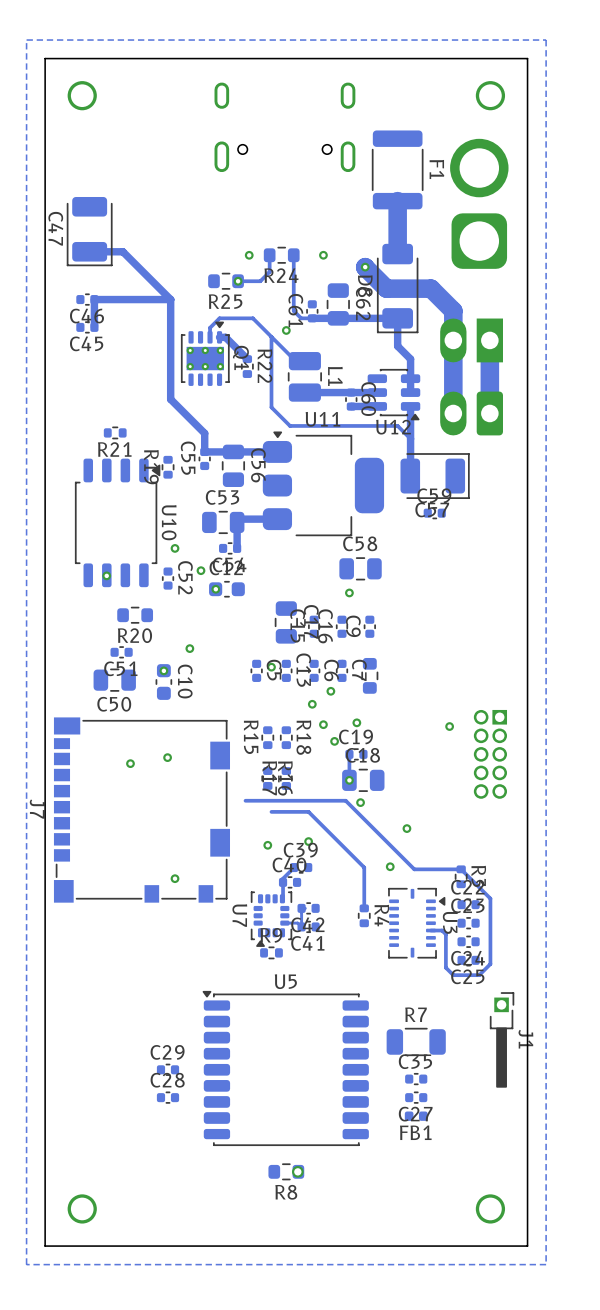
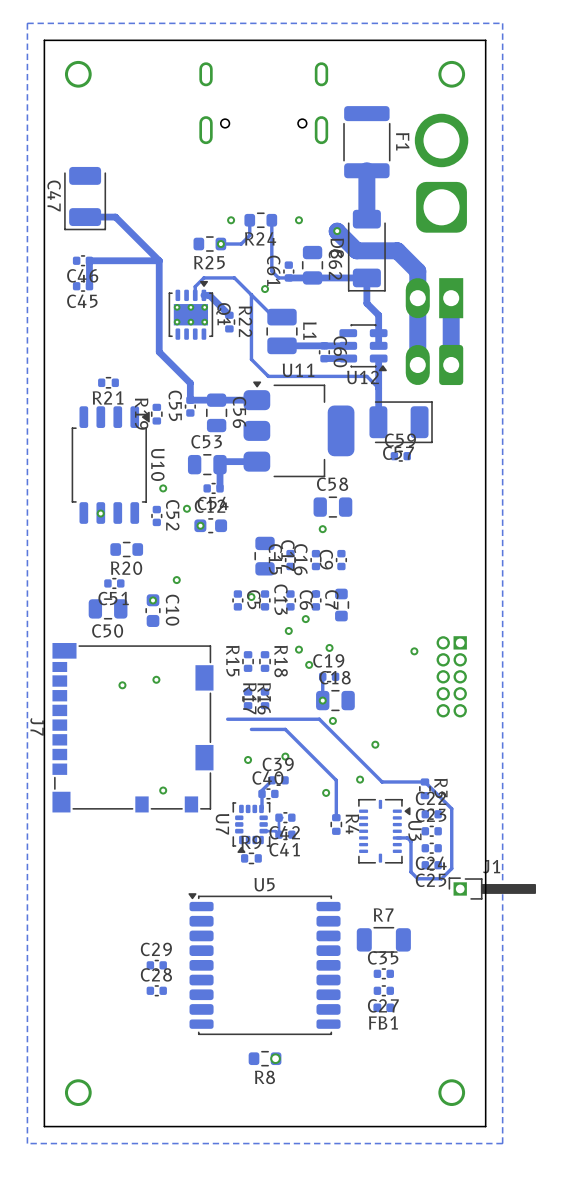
via: none -> (326, 792)
J1 rotation: 0° (502, 1039) -> 90° counterclockwise (492, 888)
J1 position: (502, 1039) -> (492, 888)

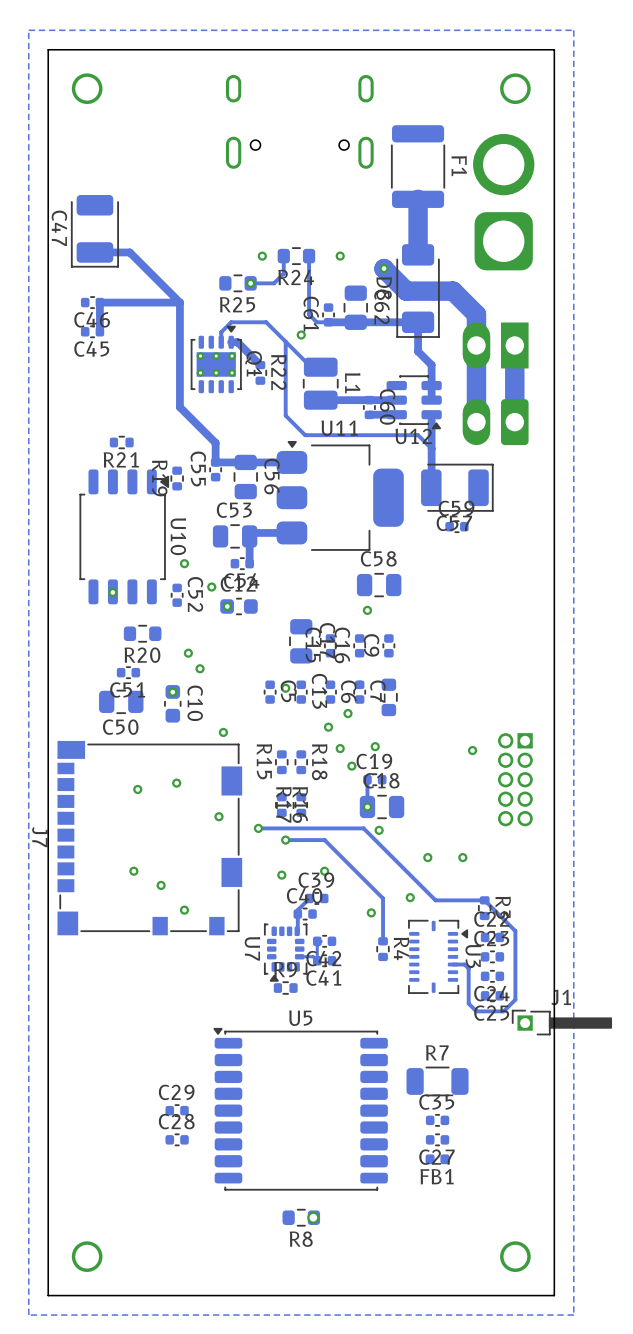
via: none -> (188, 653)
via: none -> (223, 732)
via: none -> (218, 816)
via: none -> (258, 828)
via: none -> (285, 840)
via: none -> (462, 857)
via: none -> (133, 871)
via: none -> (161, 885)

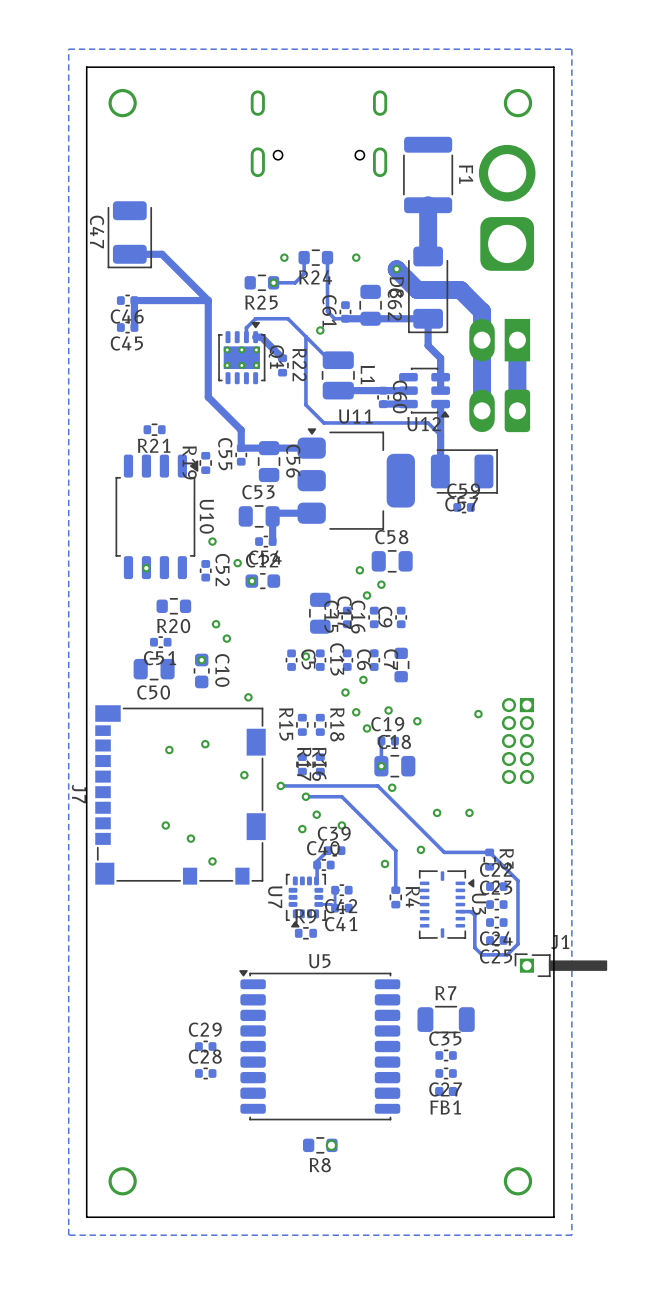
via: none -> (359, 570)
via: none -> (367, 595)
via: none -> (417, 721)
via: none -> (316, 814)

